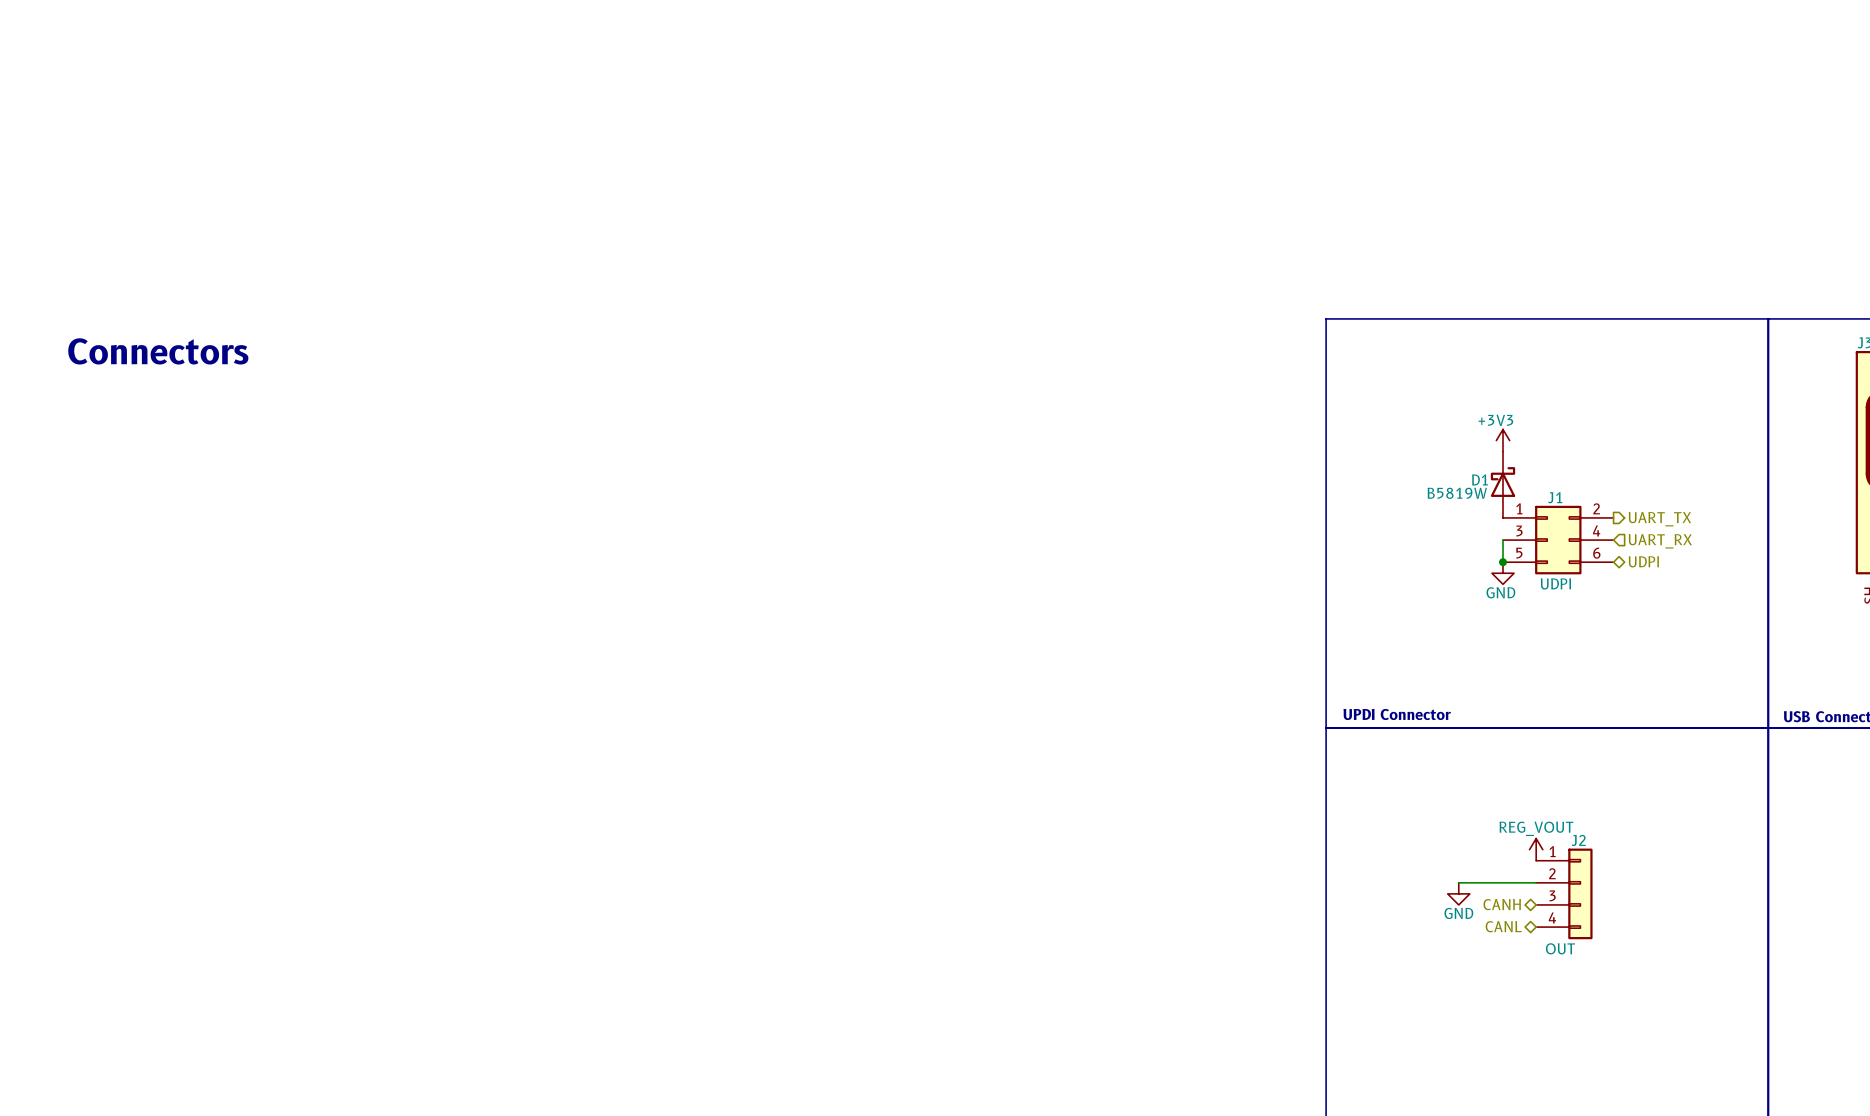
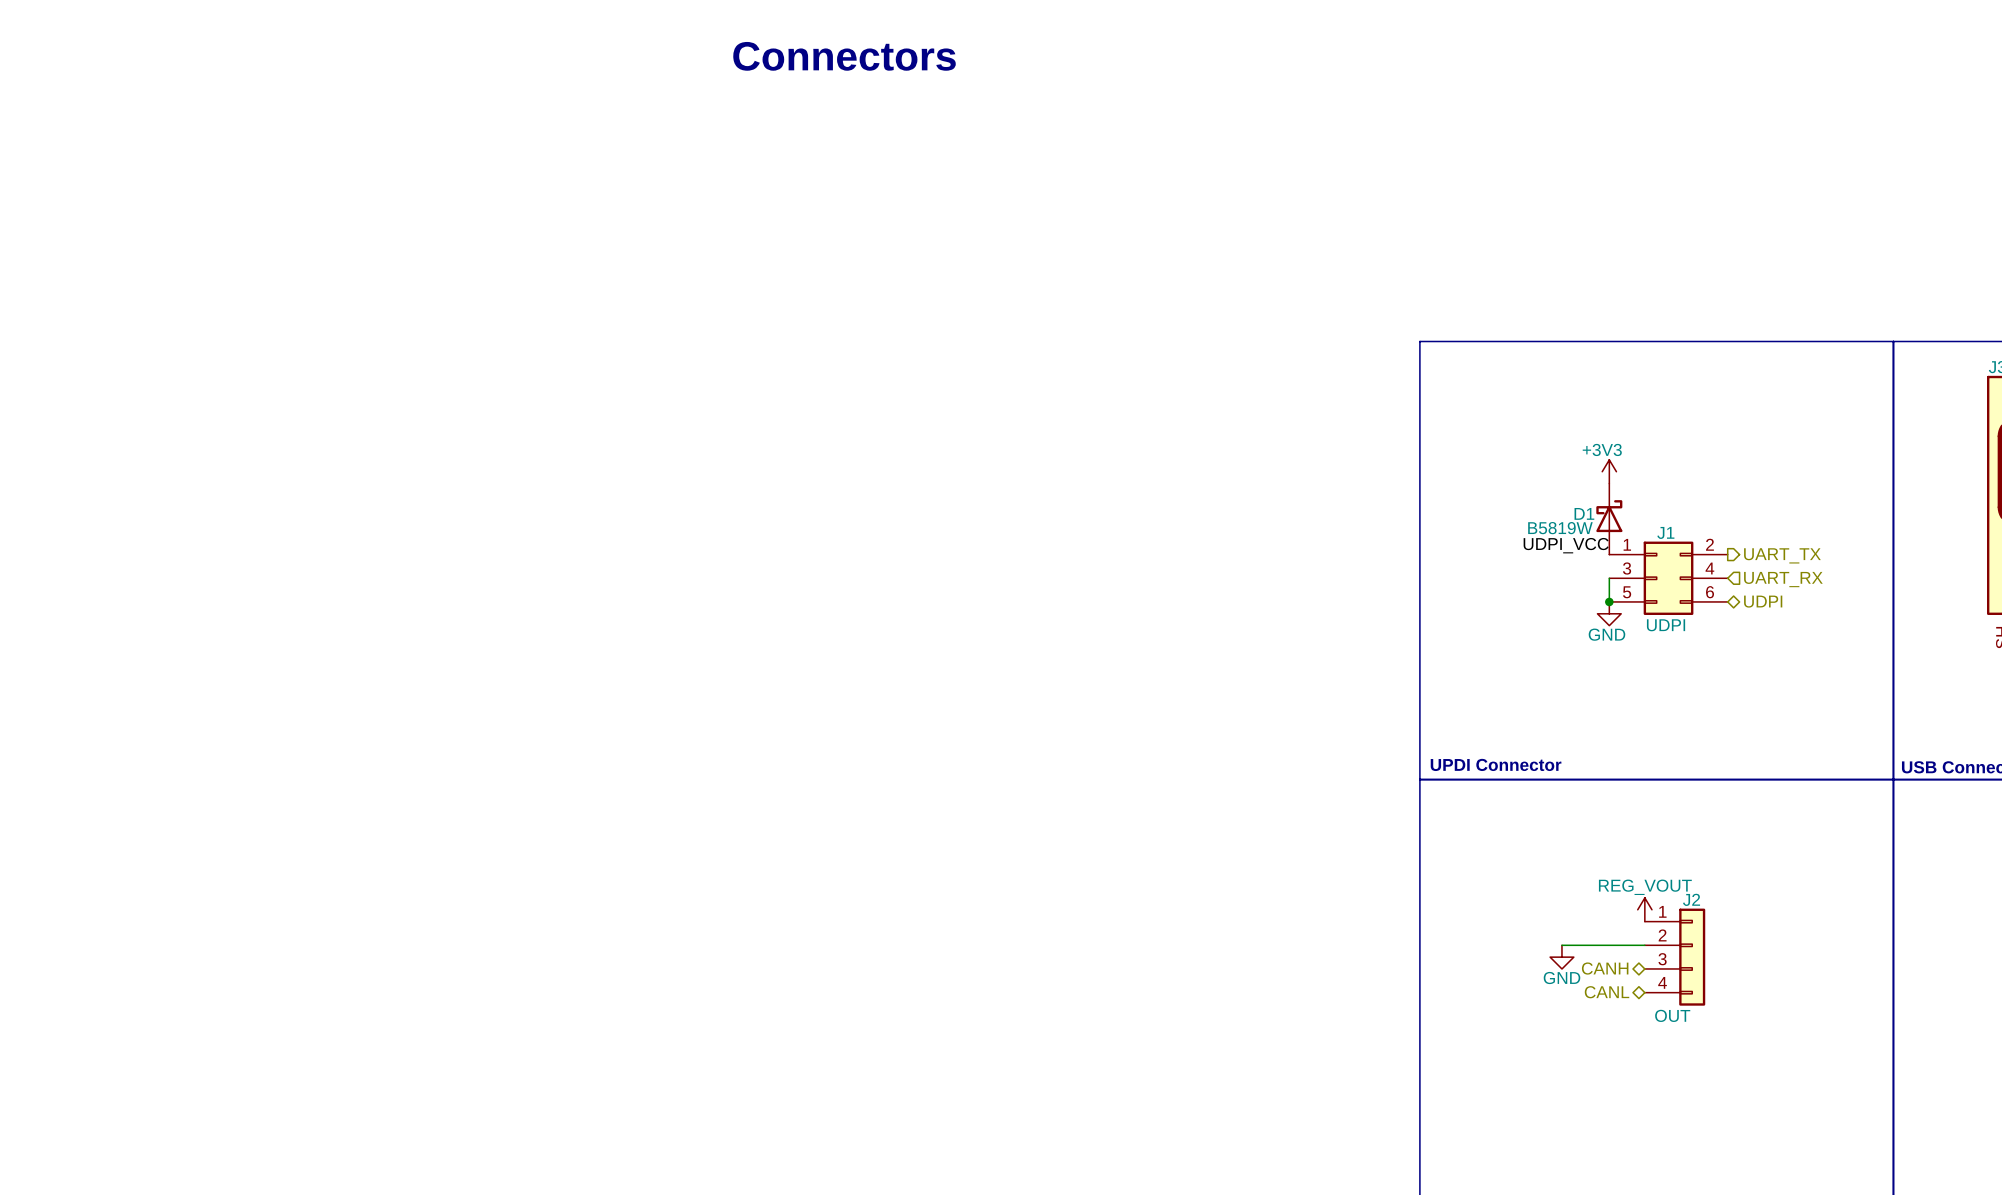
text: none -> Connectors (844, 56)
text: Connectors (158, 351) -> none
label: none -> UDPI_VCC (1566, 545)

